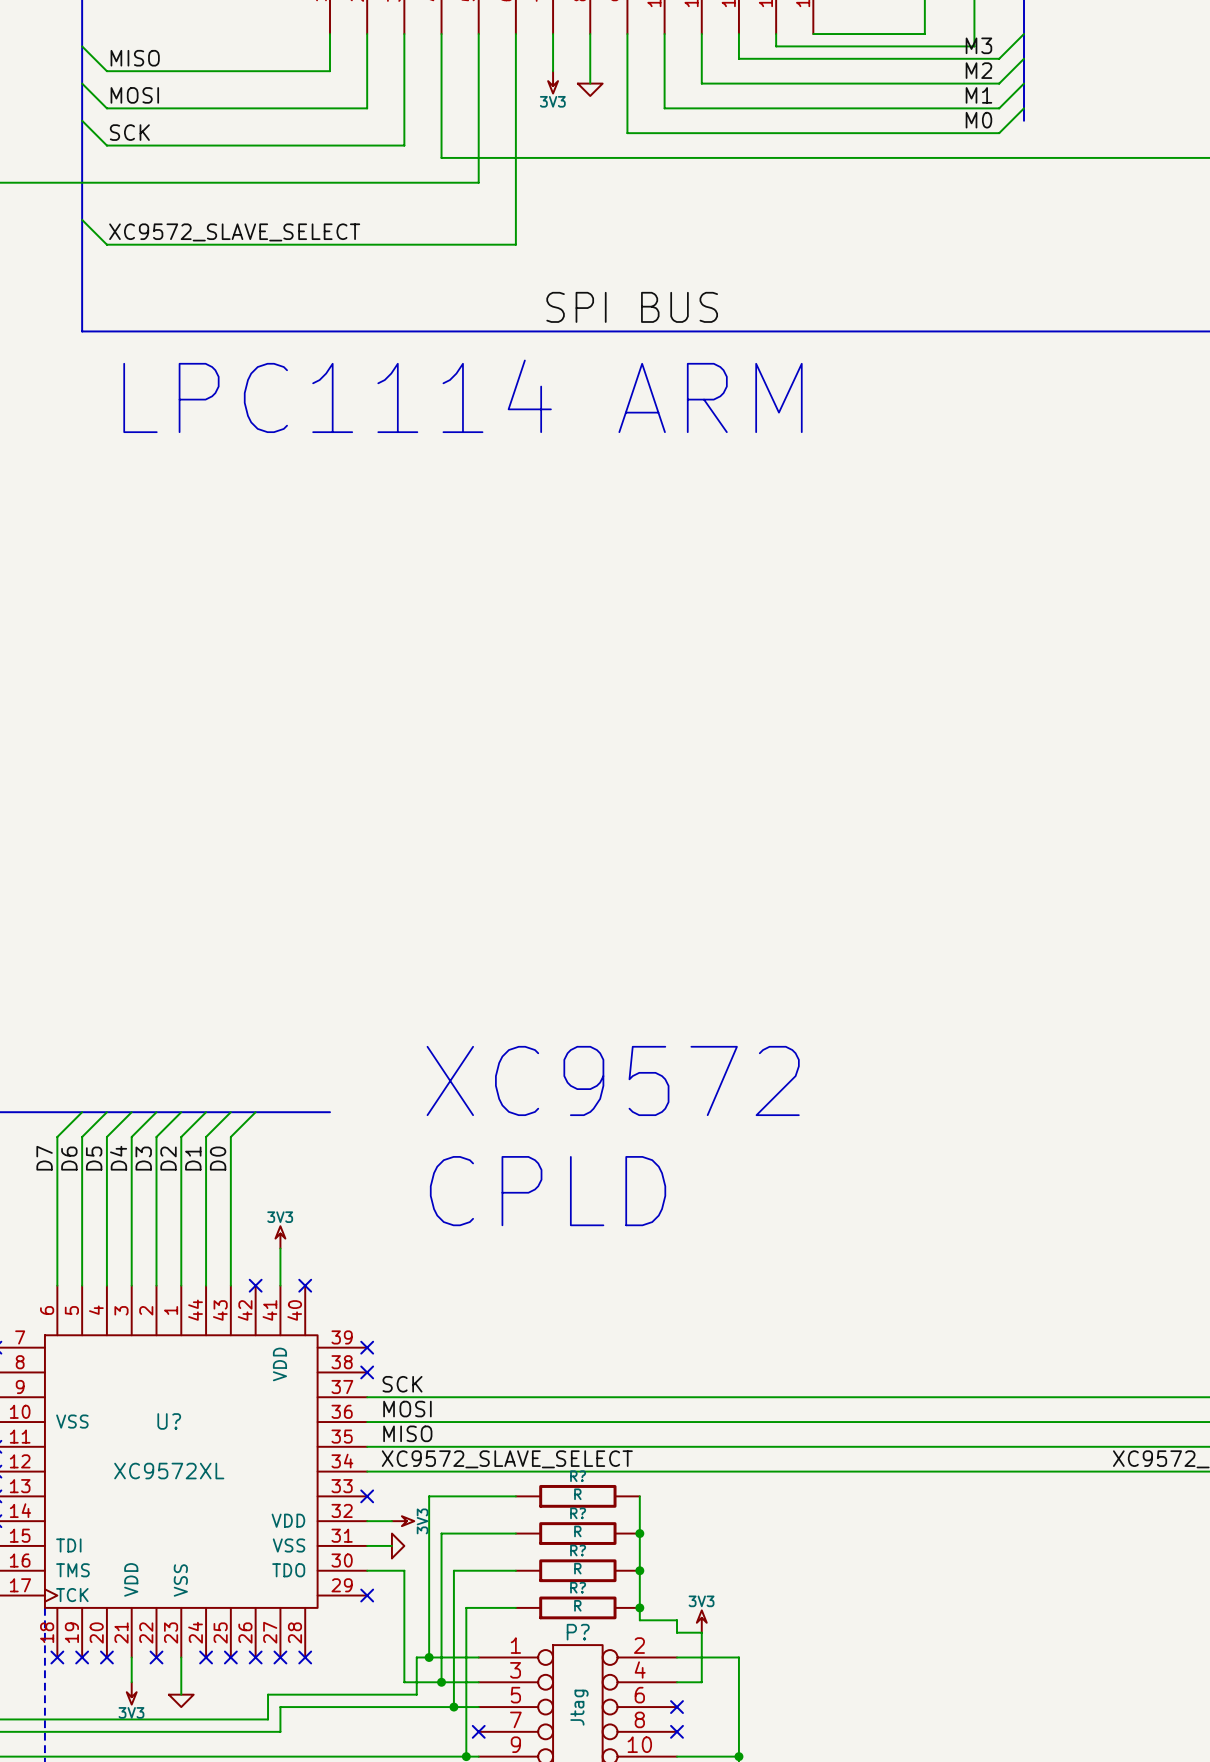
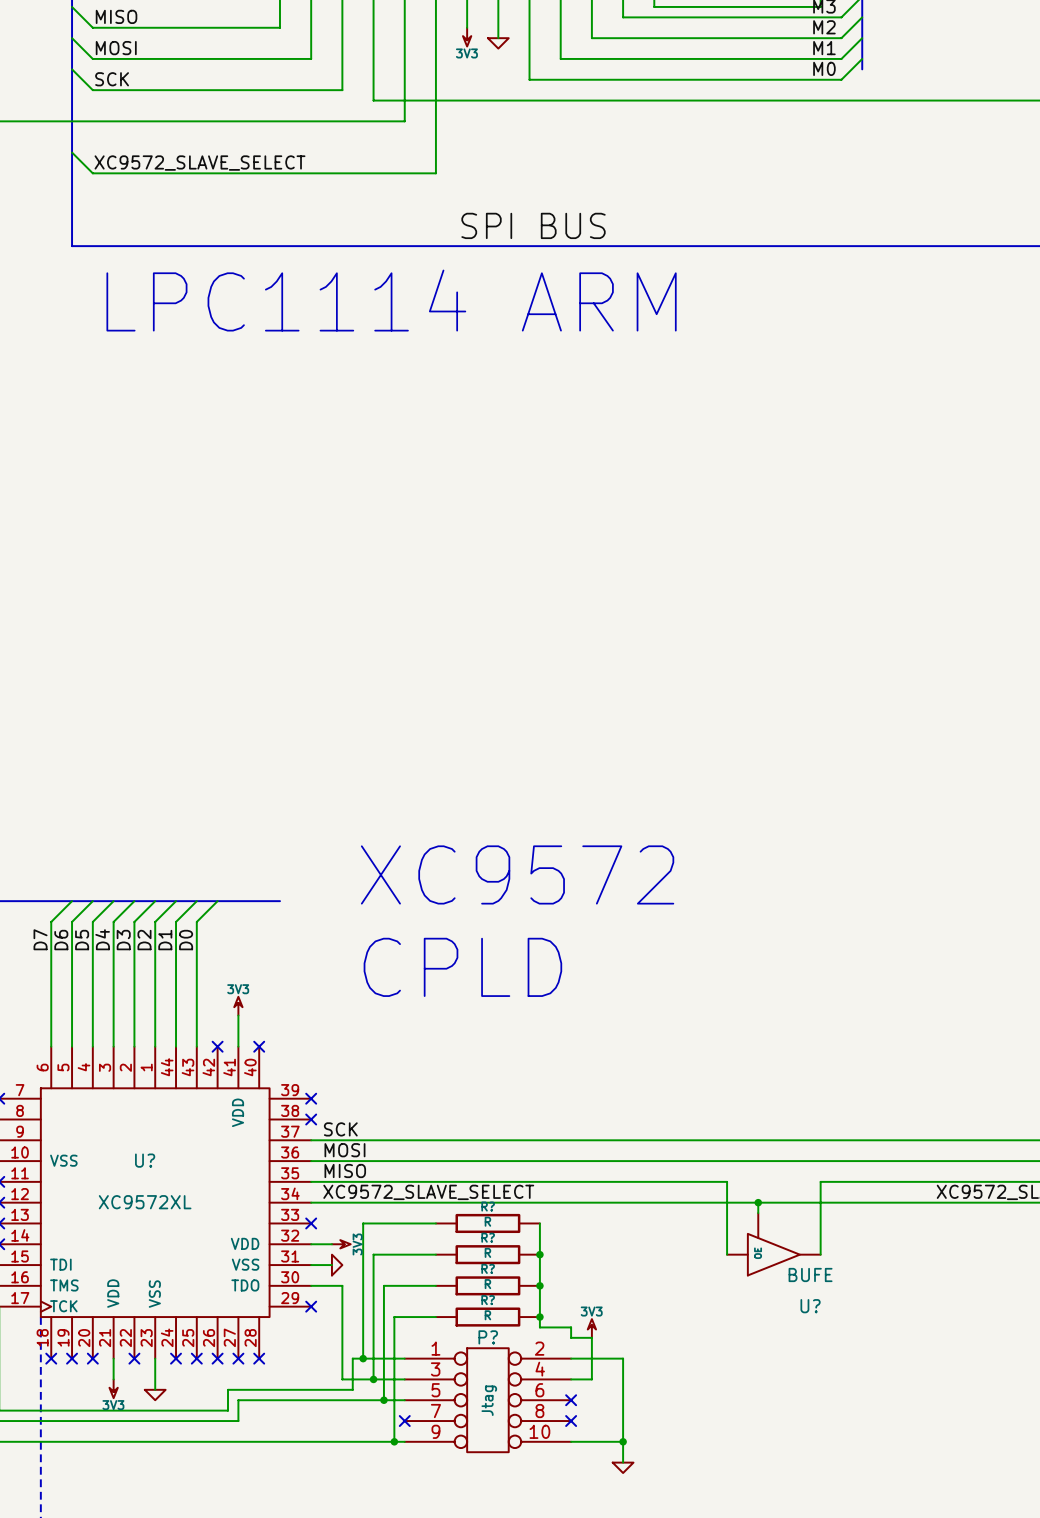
wire: (862, 1446) (974, 1446) -> (727, 1181) (727, 1254)
wire: none -> (820, 1181) (820, 1254)
wire: none -> (758, 1202) (758, 1213)
junction: none -> (758, 1202)
U?: none -> BUFE (773, 1244)

